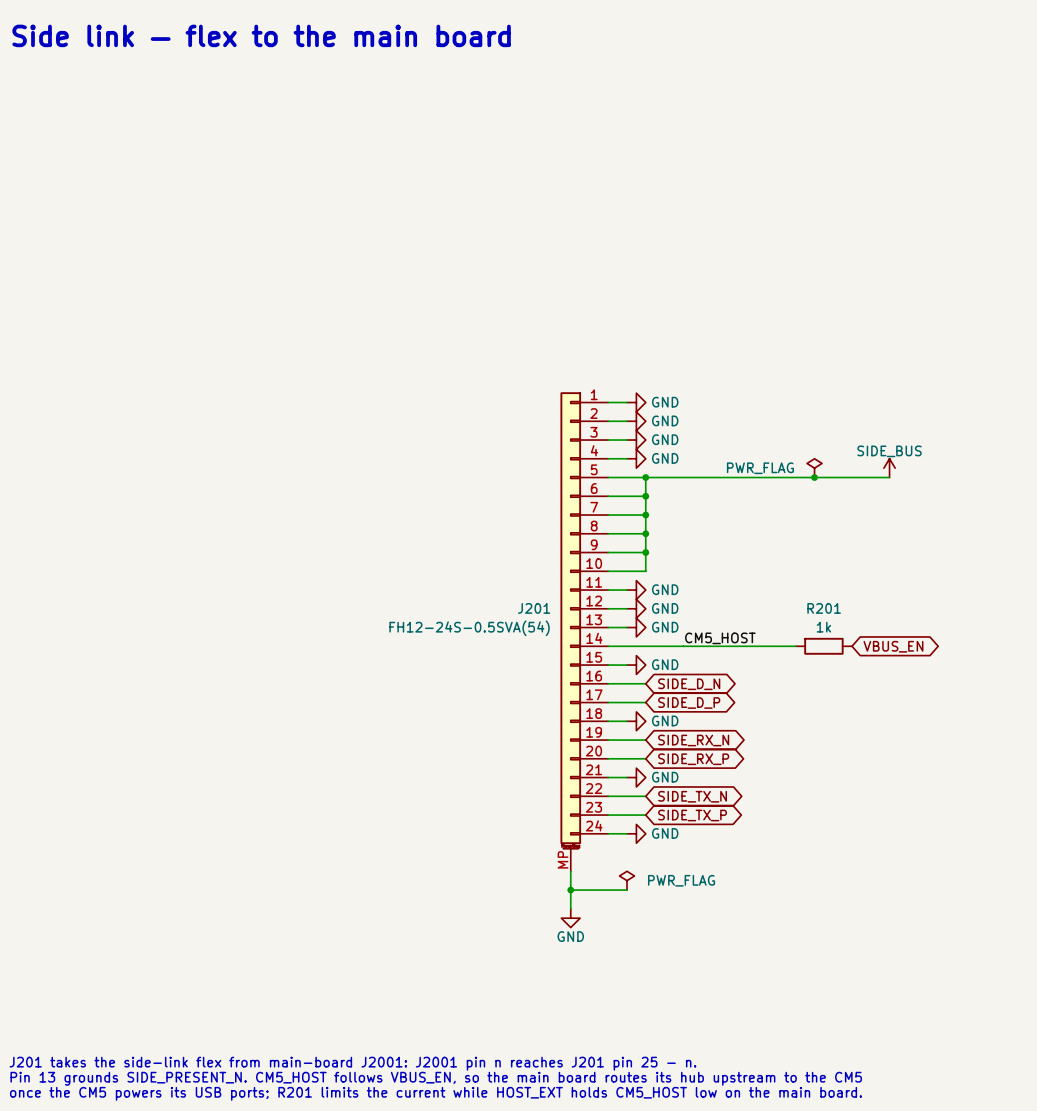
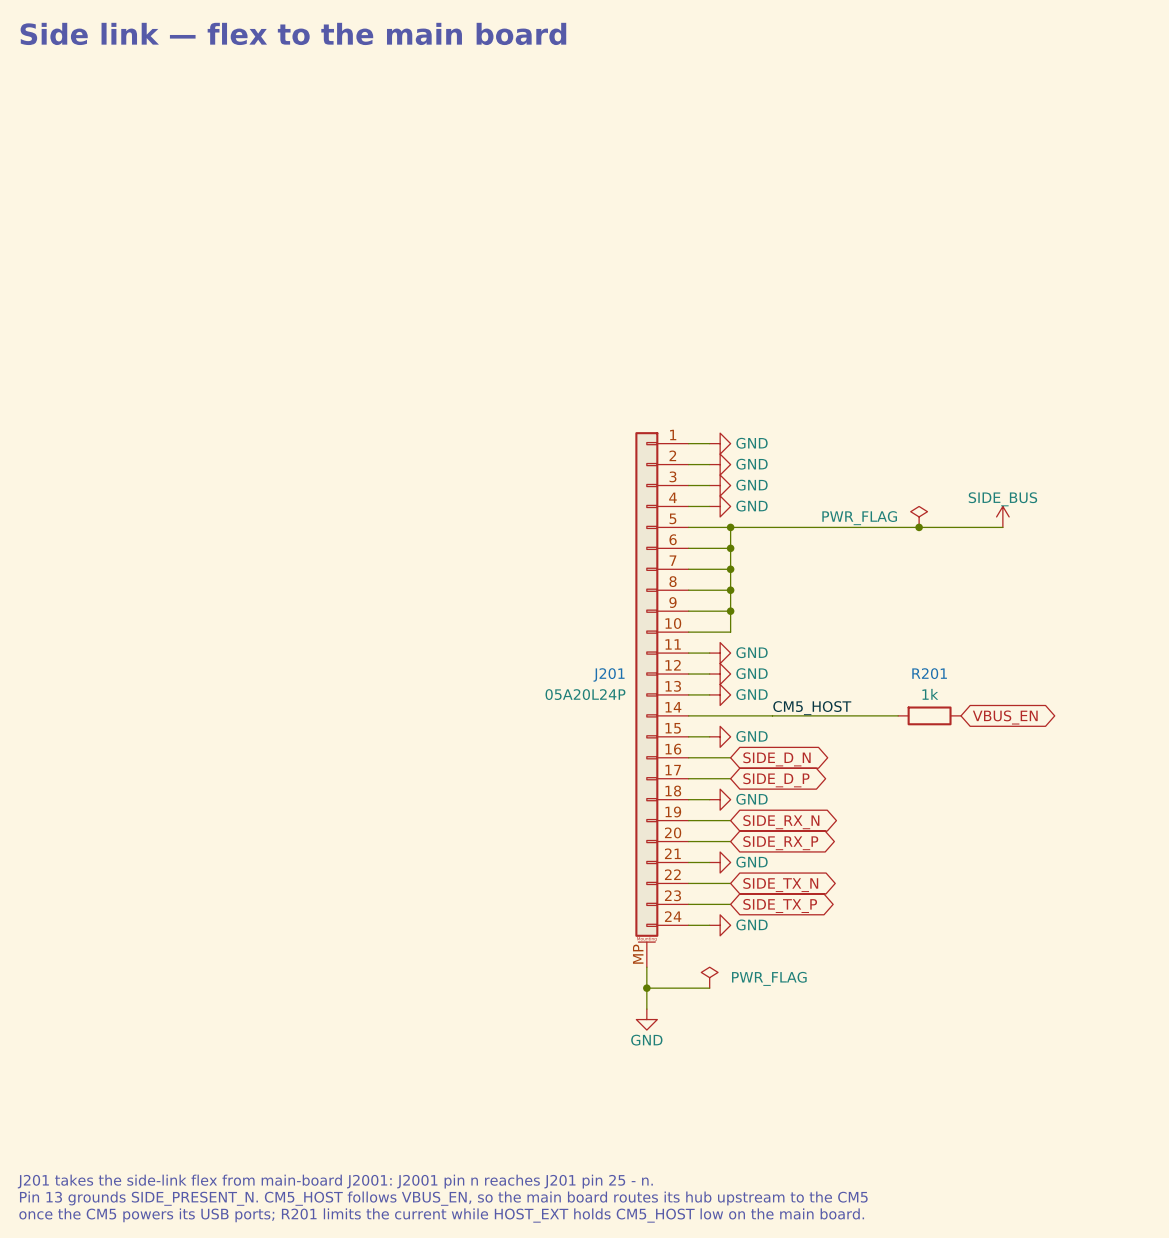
J201 value: FH12-24S-0.5SVA(54) (469, 628) -> 05A20L24P (585, 694)

